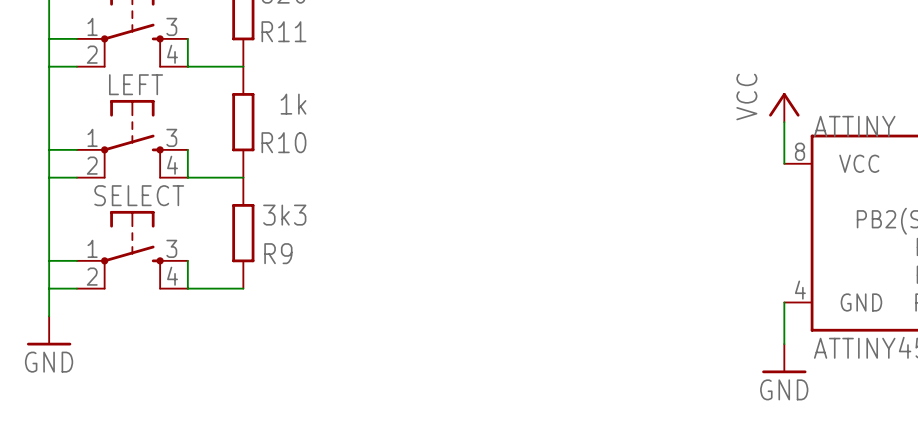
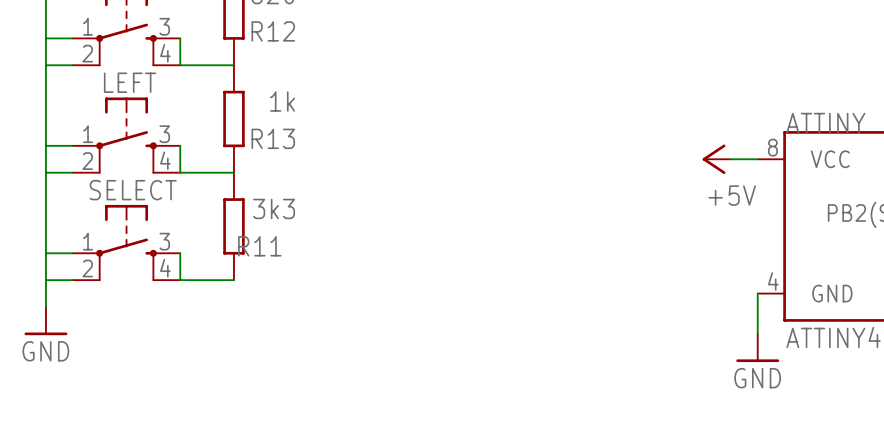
R11 name: R11 (283, 31) -> R12 (273, 31)
power symbol: VCC (784, 107) -> none
wire: (784, 122) (784, 163) -> (730, 159) (757, 159)
R10 name: R10 (283, 142) -> R13 (273, 138)
power symbol: none -> +5V (716, 159)
R9 name: R9 (278, 253) -> R11 (259, 246)

